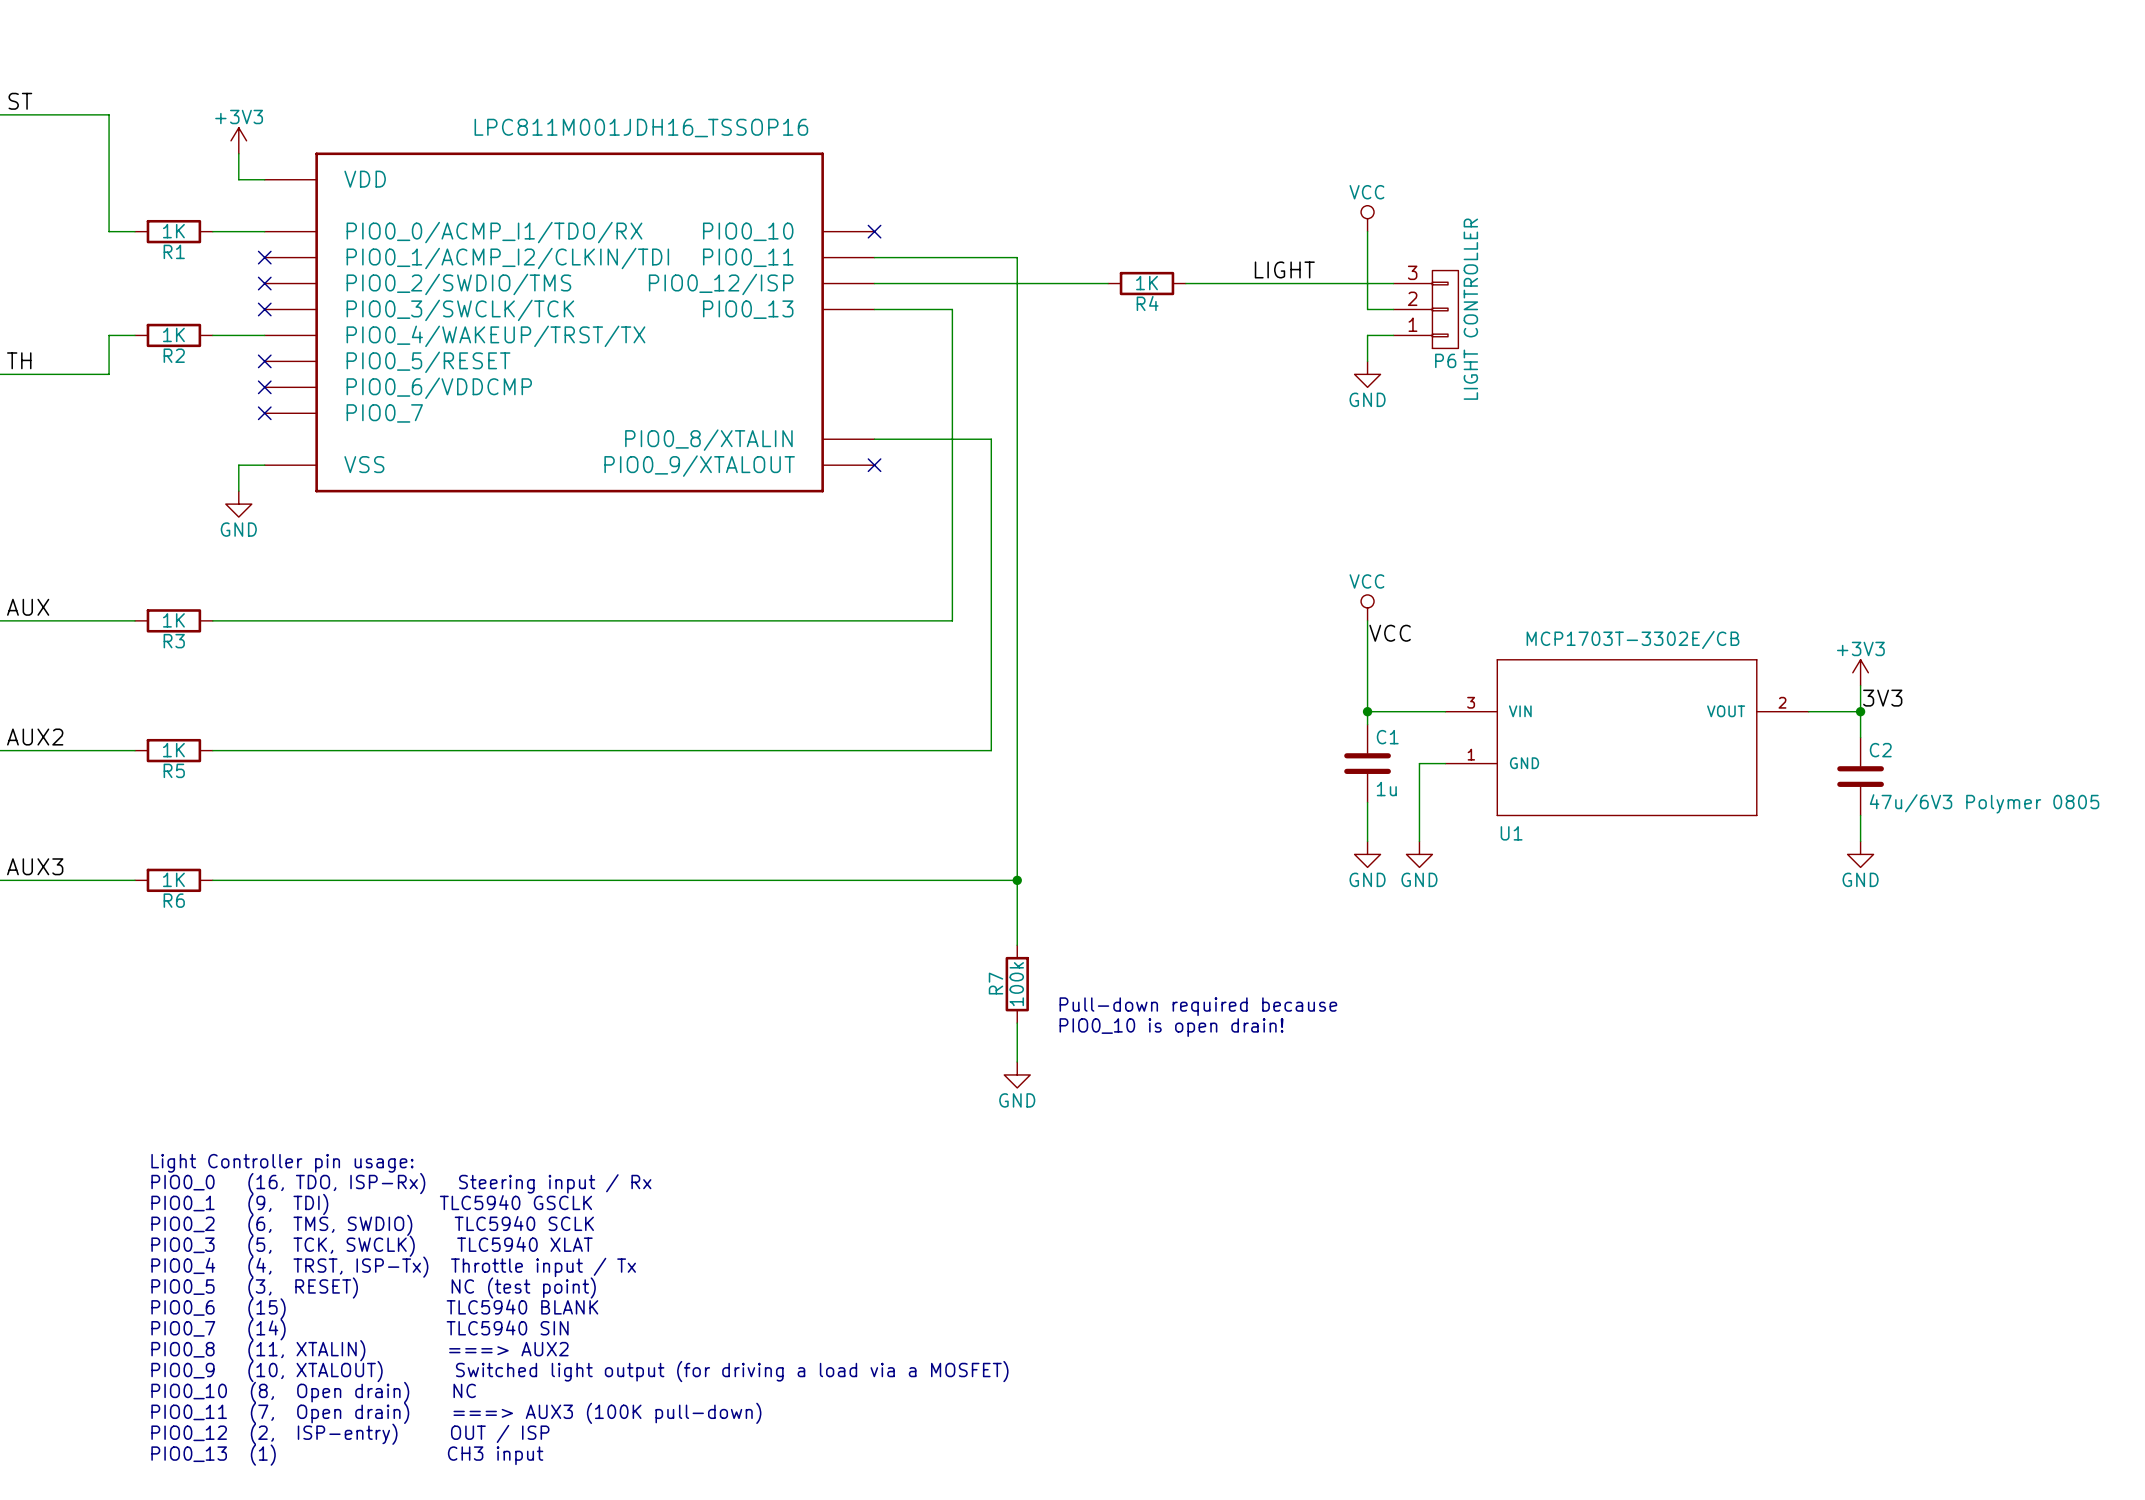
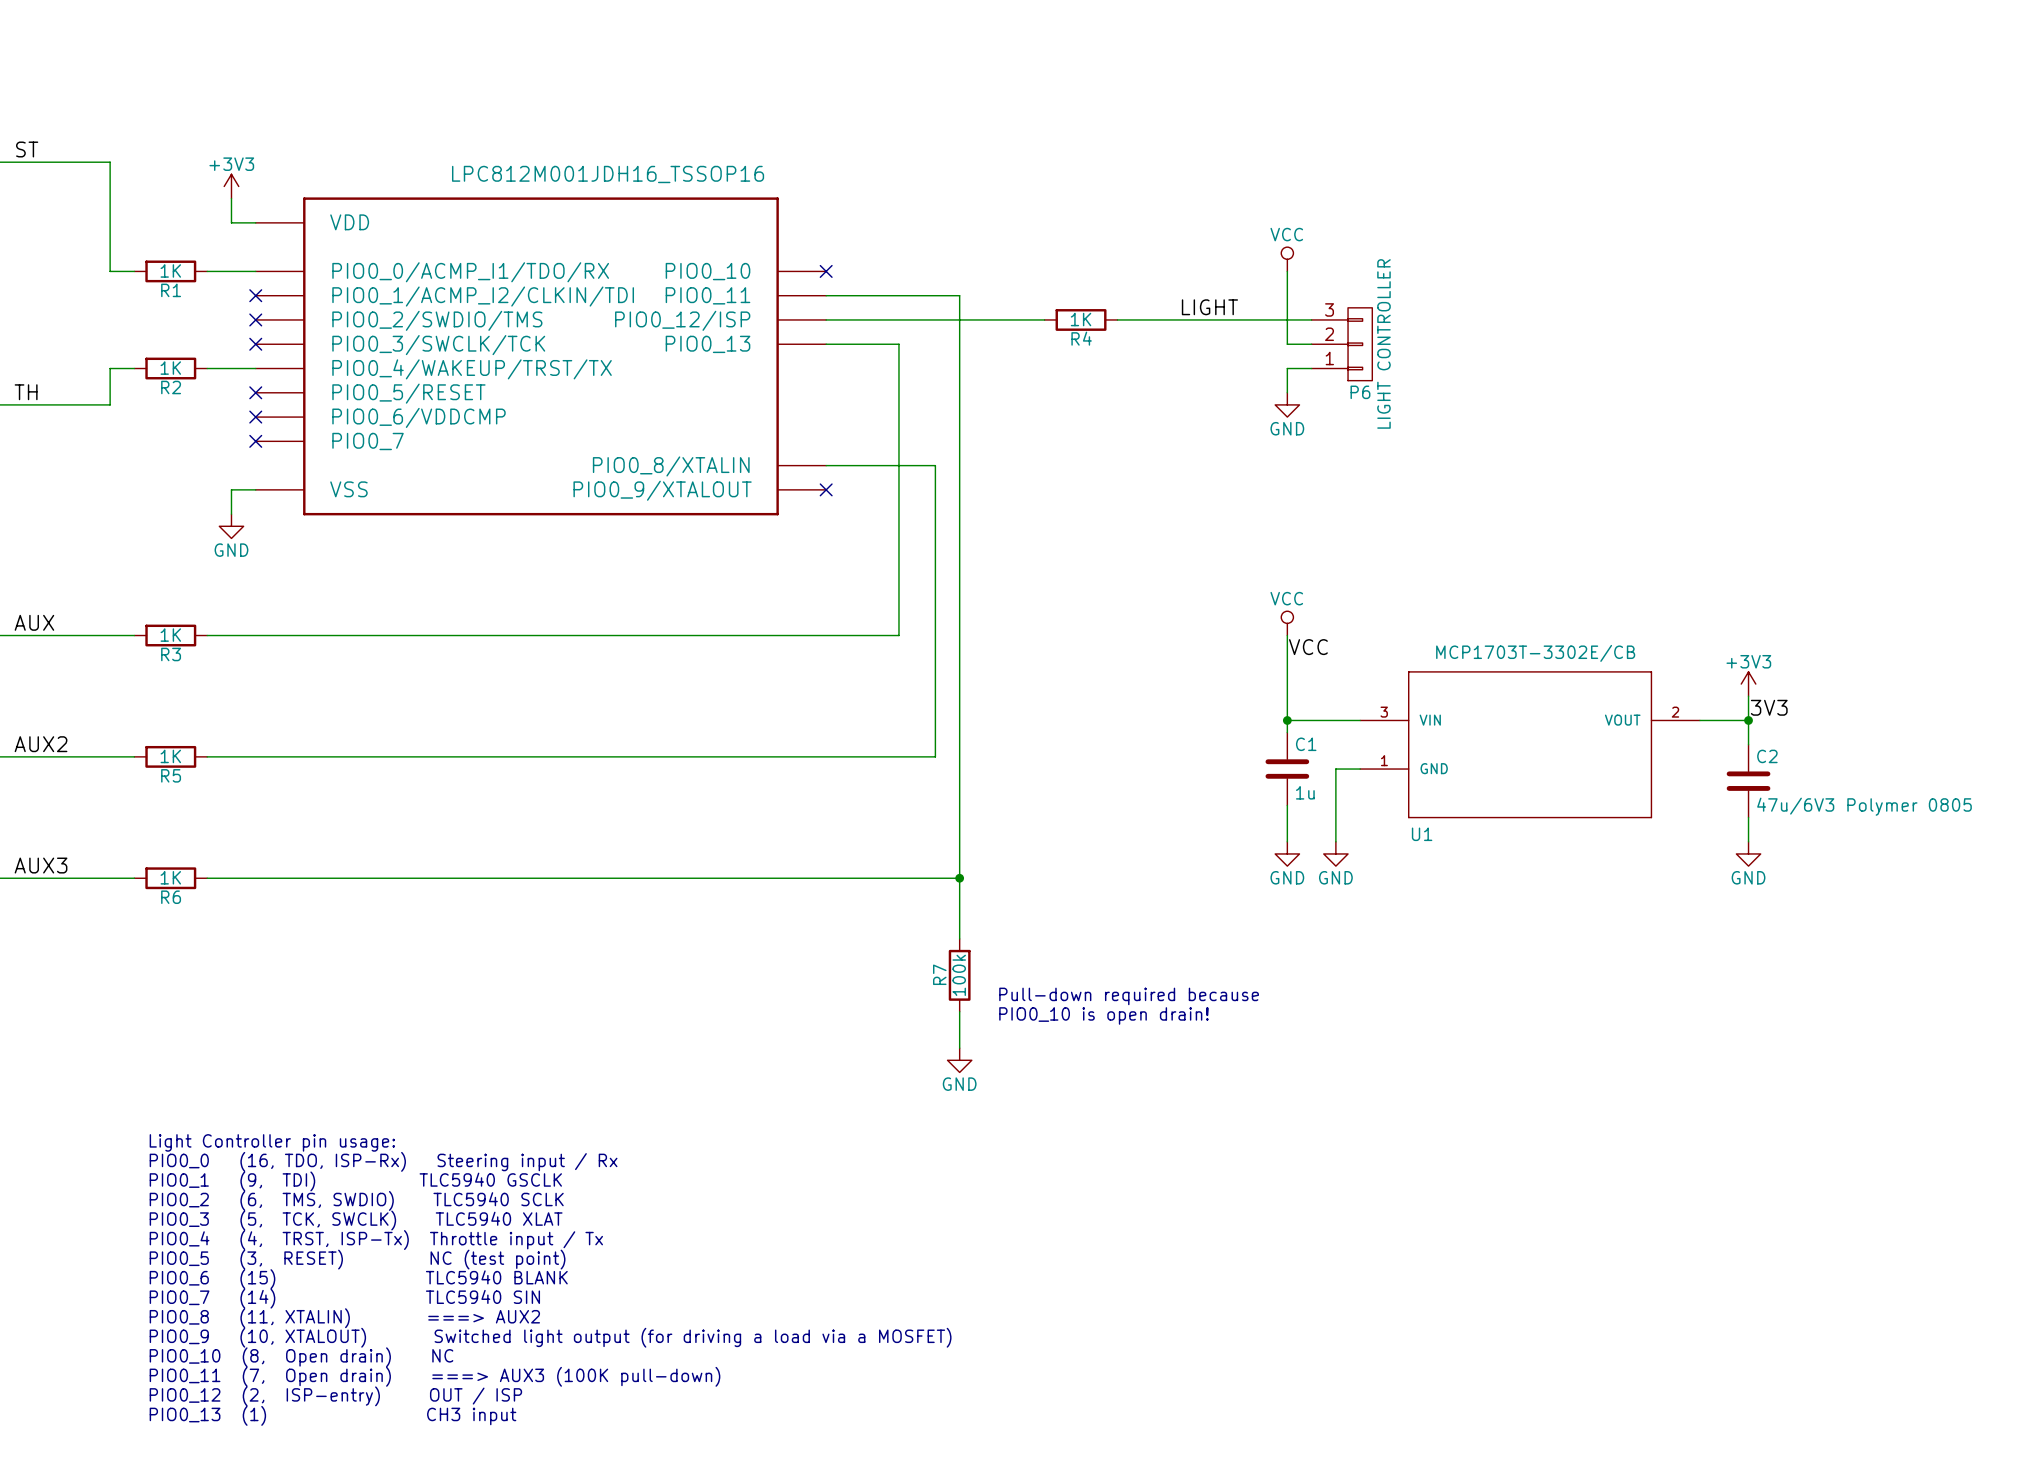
part value: LPC811M001JDH16_TSSOP16 (641, 128) -> LPC812M001JDH16_TSSOP16 (608, 174)

